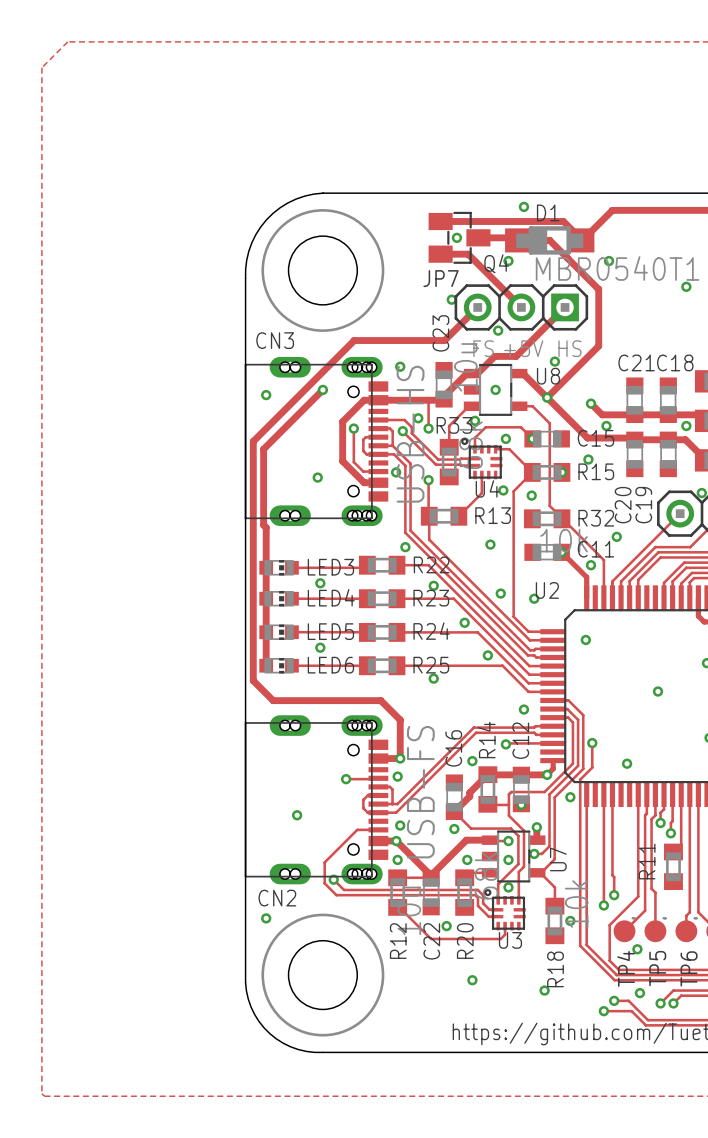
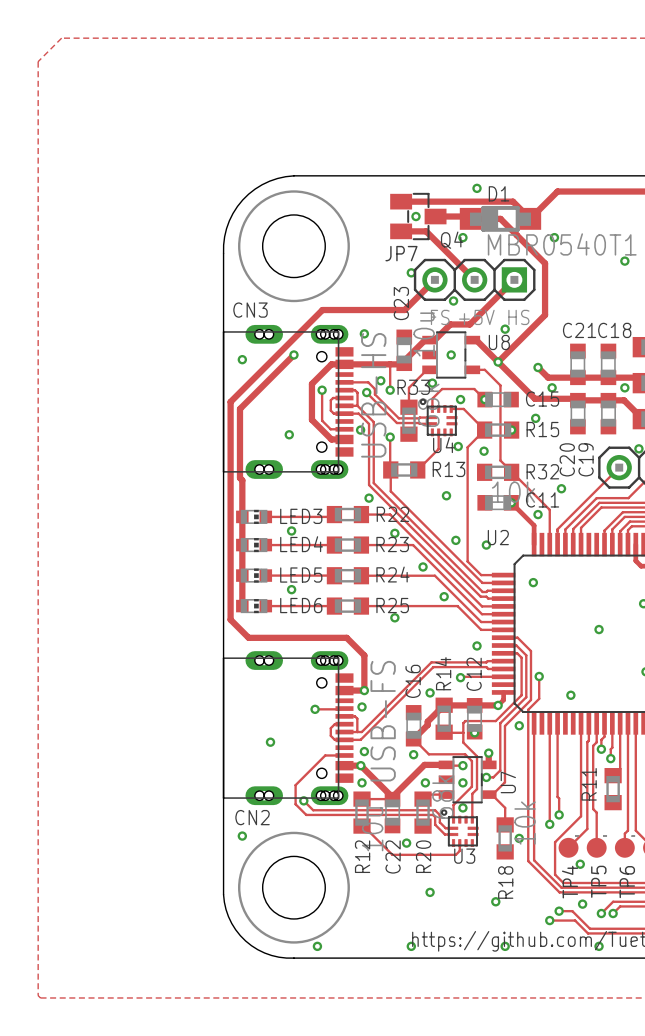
via: none -> (317, 946)
via: none -> (411, 946)
via: none -> (505, 946)
via: none -> (599, 946)

